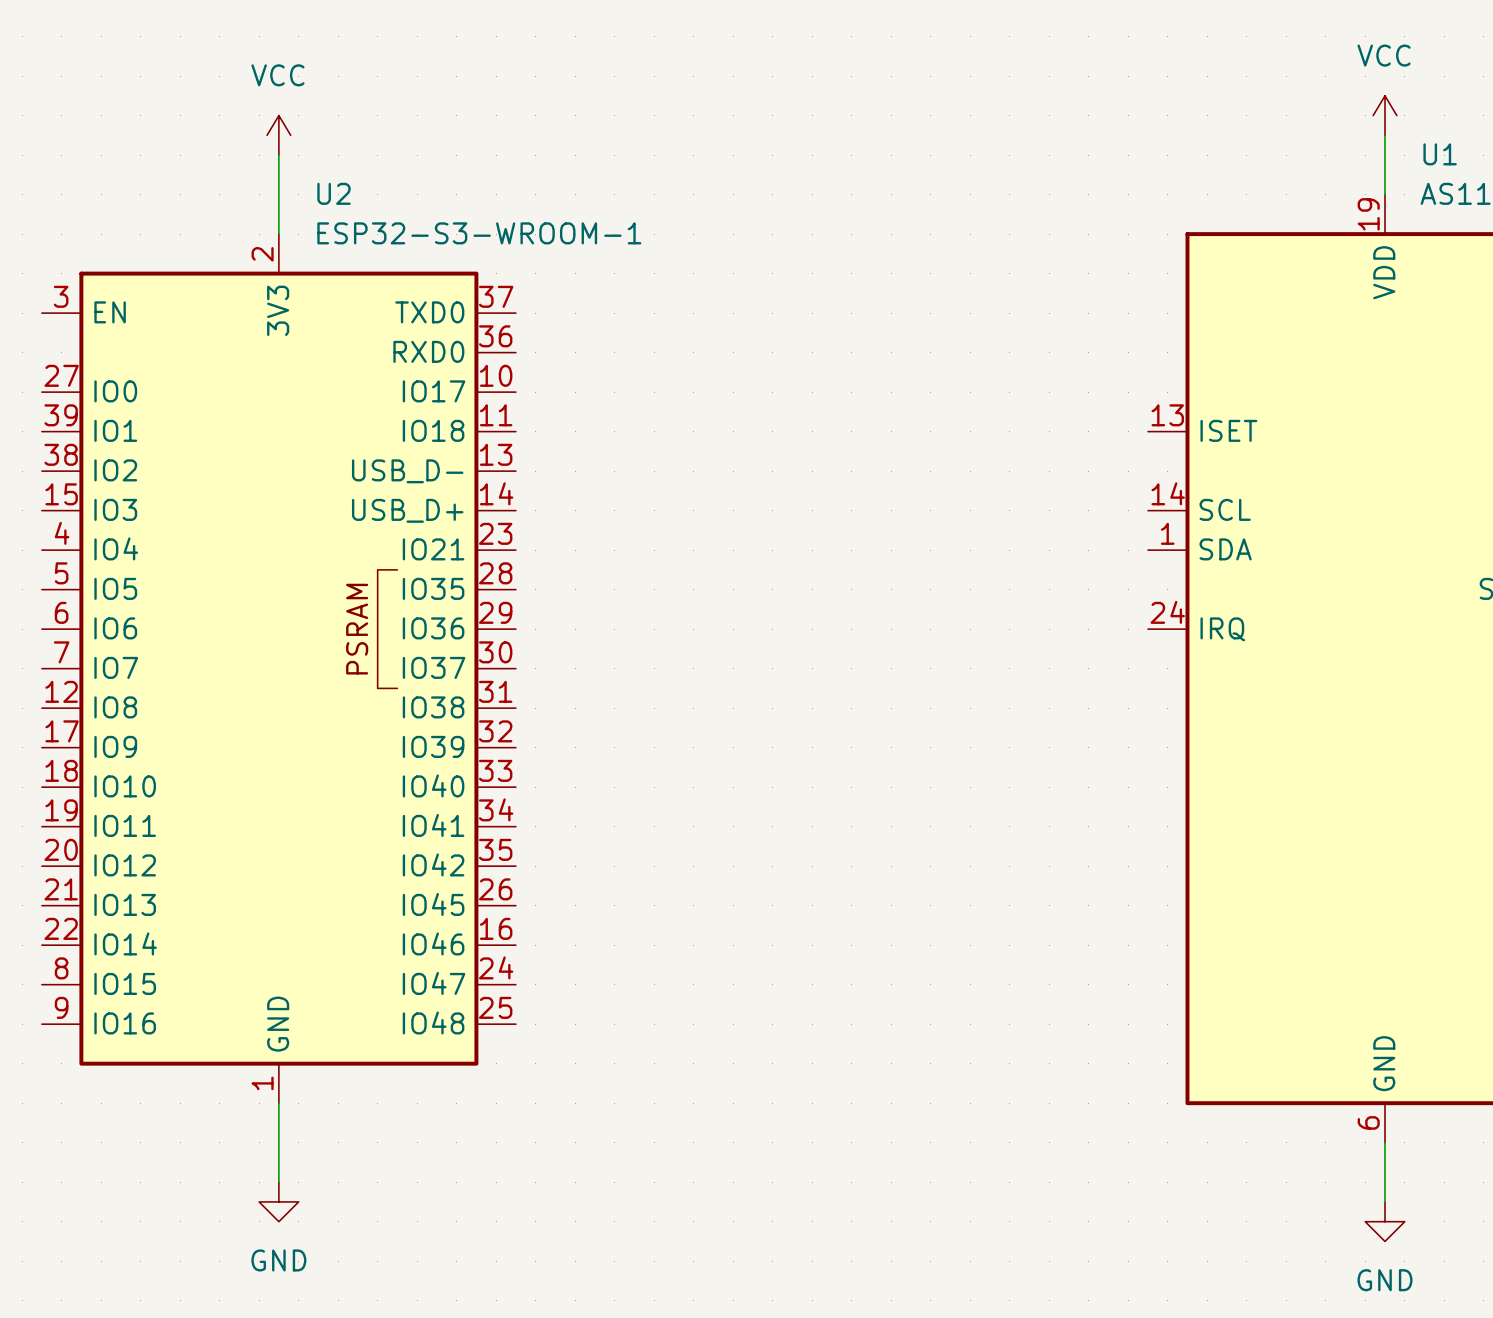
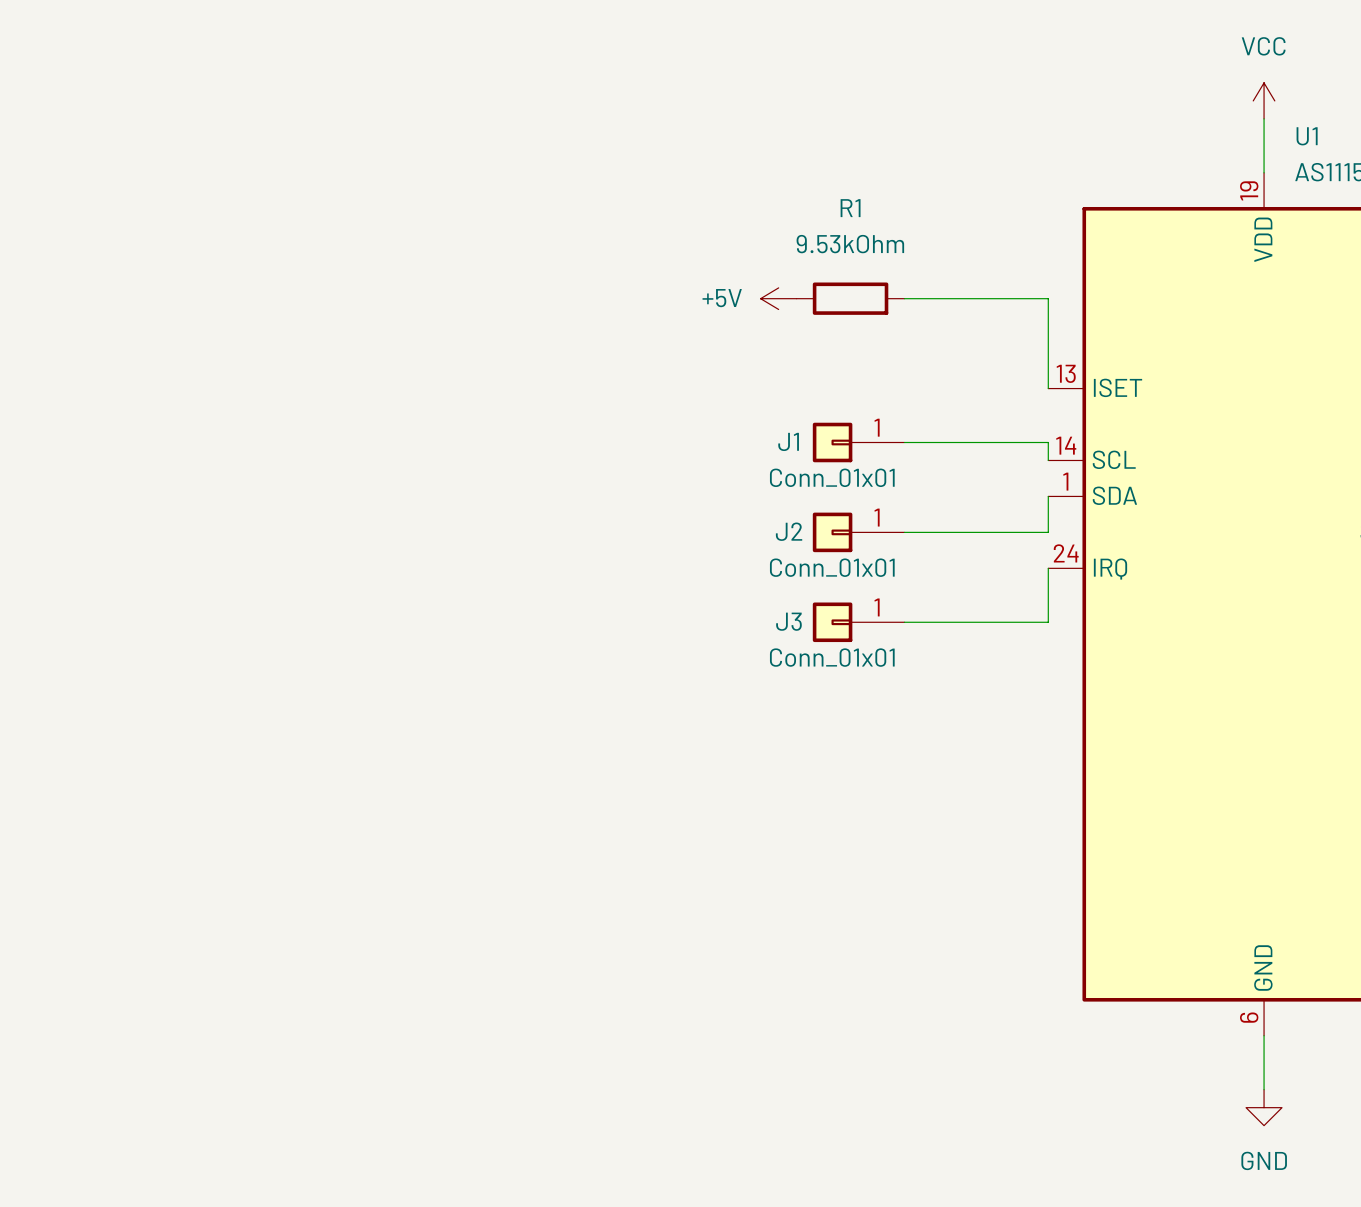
power symbol: VCC (278, 135) -> none
wire: (278, 155) (278, 234) -> none
power symbol: none -> +5V (778, 298)
R1: none -> 9.53kOhm (850, 298)
wire: none -> (904, 298) (1048, 298) (1048, 388)
J1: none -> Conn_01x01 (858, 442)
wire: none -> (904, 442) (1048, 442) (1048, 460)
wire: none -> (1048, 496) (1048, 532) (904, 532)
J2: none -> Conn_01x01 (858, 532)
wire: none -> (1048, 568) (1048, 622) (904, 622)
U2: ESP32-S3-WROOM-1 (278, 668) -> none
J3: none -> Conn_01x01 (858, 622)
wire: (278, 1103) (278, 1182) -> none
power symbol: GND (278, 1201) -> none

